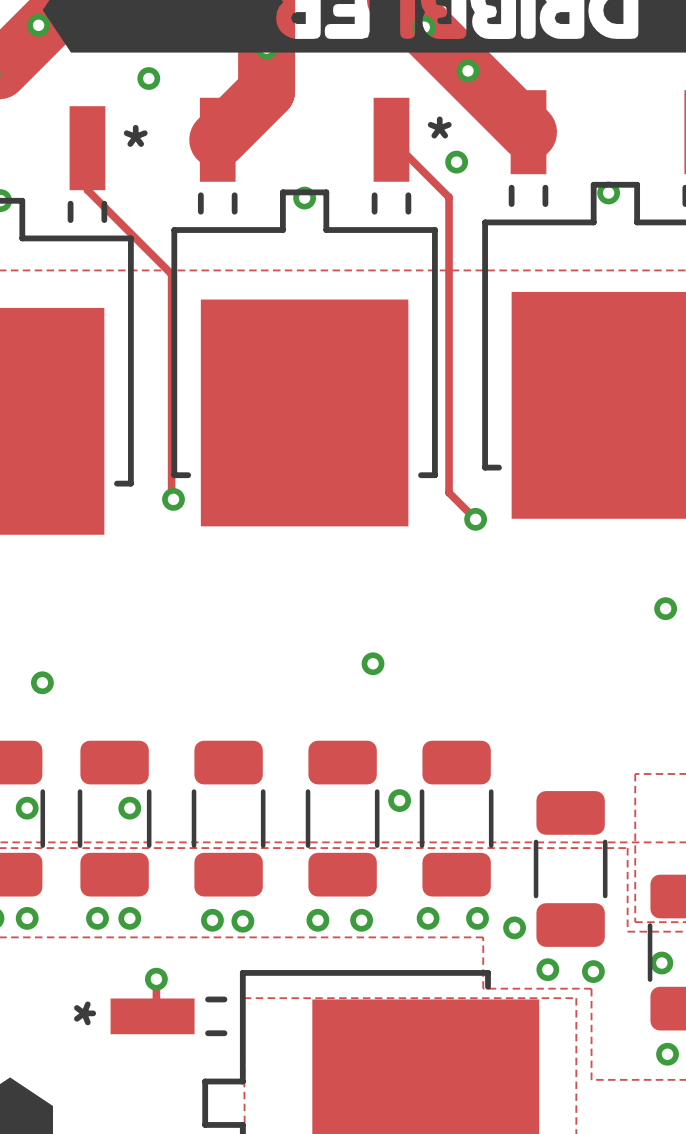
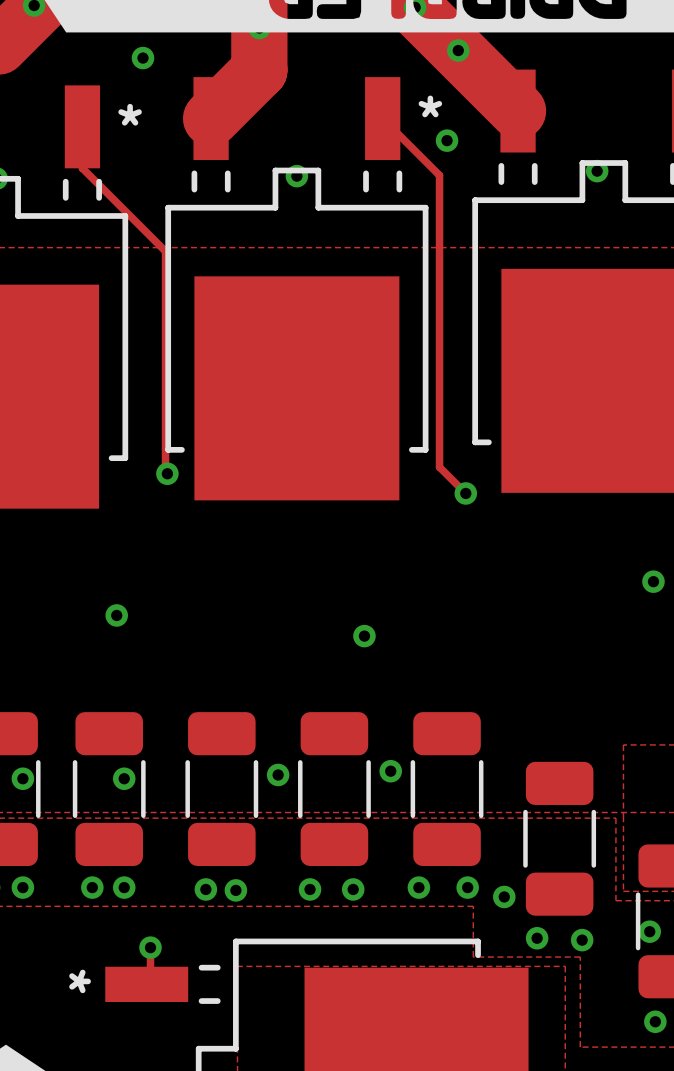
via position: (42, 682) -> (116, 615)
via: none -> (278, 774)

